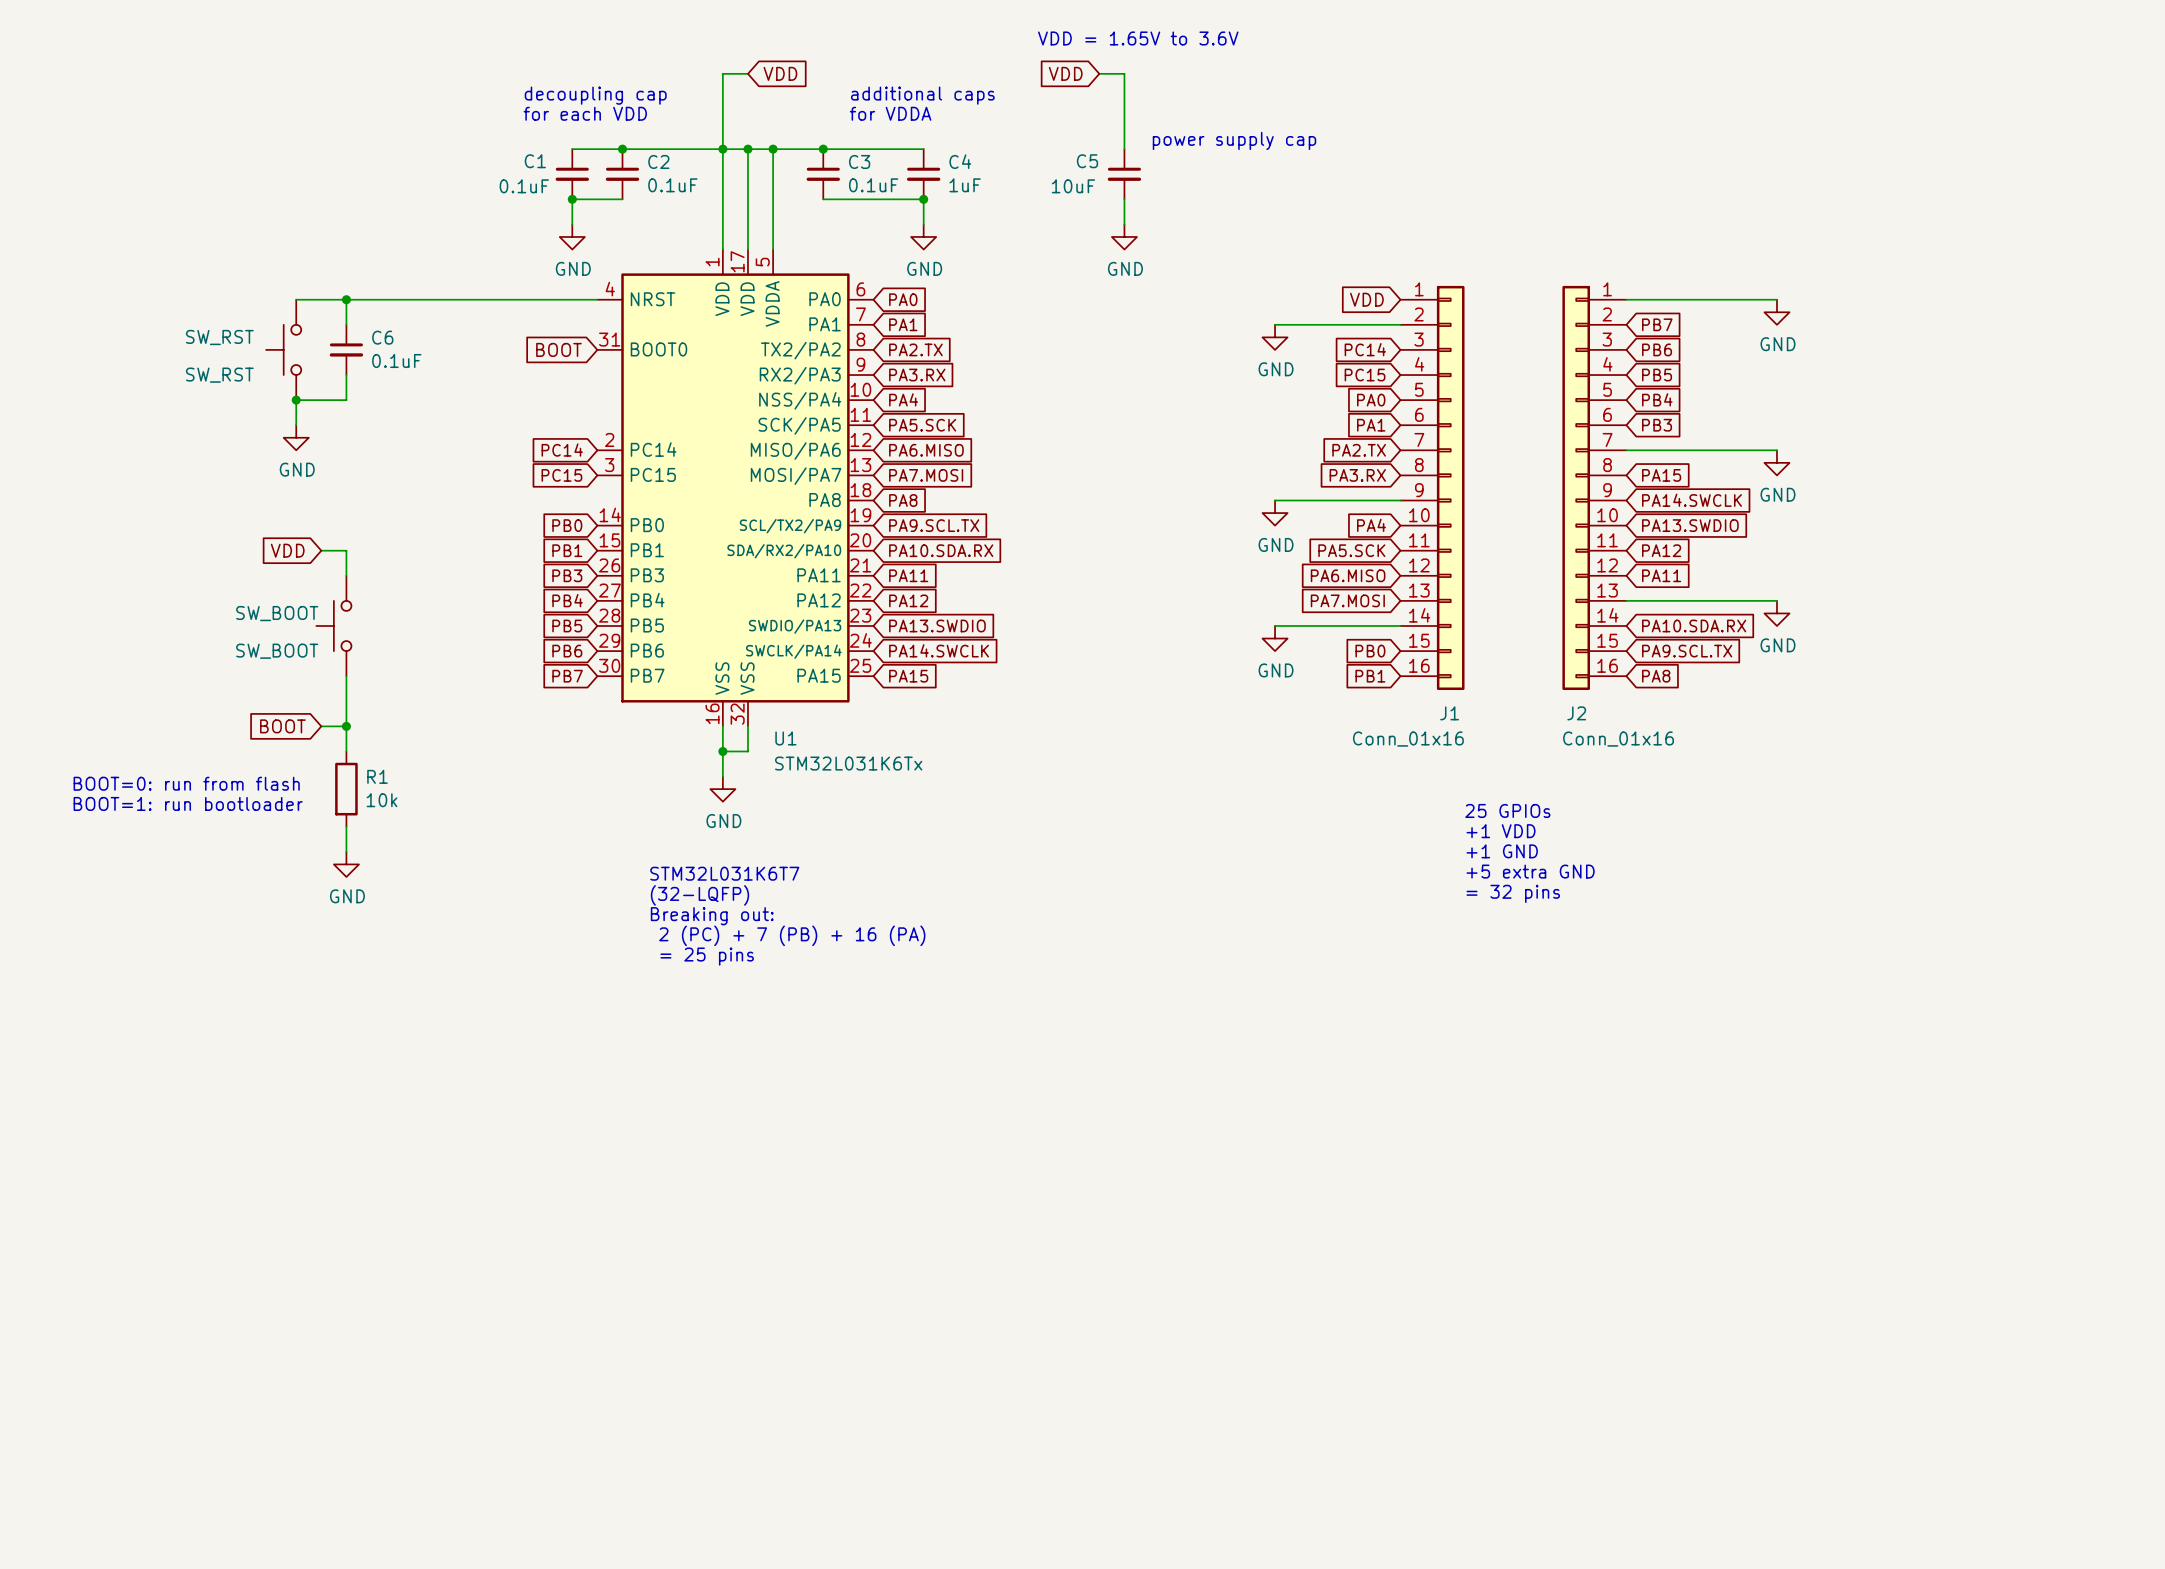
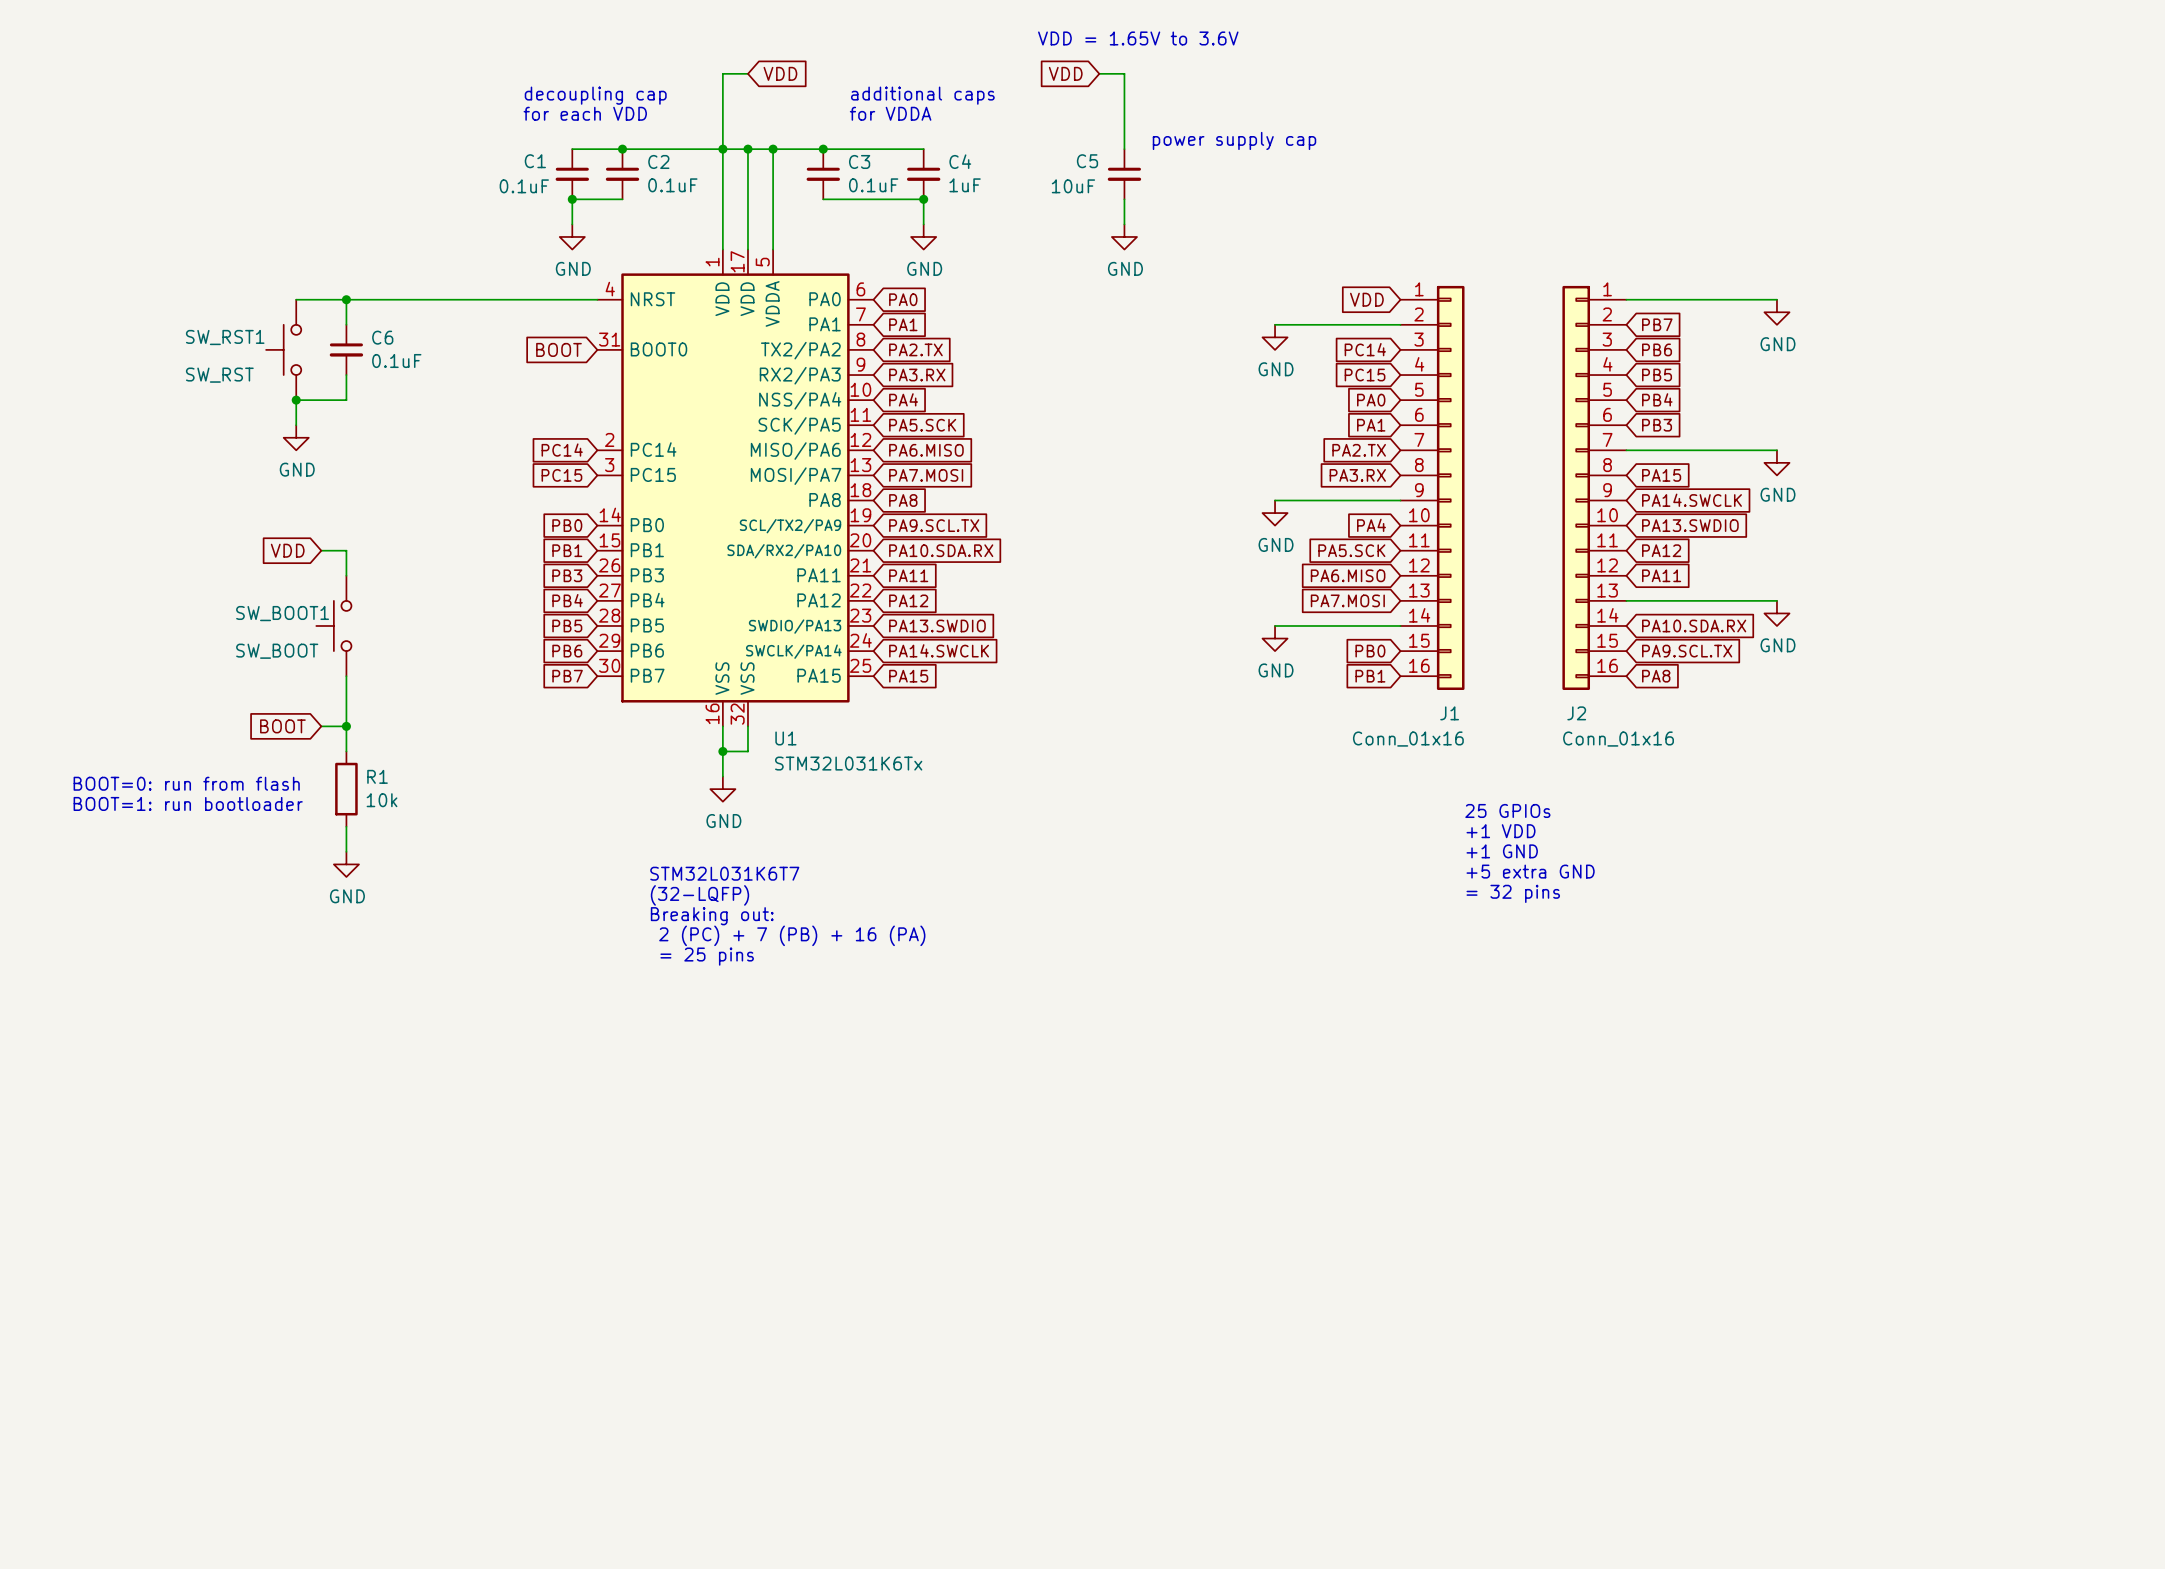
SW_RST name: SW_RST (219, 337) -> SW_RST1 (225, 337)
SW_BOOT name: SW_BOOT (277, 613) -> SW_BOOT1 (282, 613)

